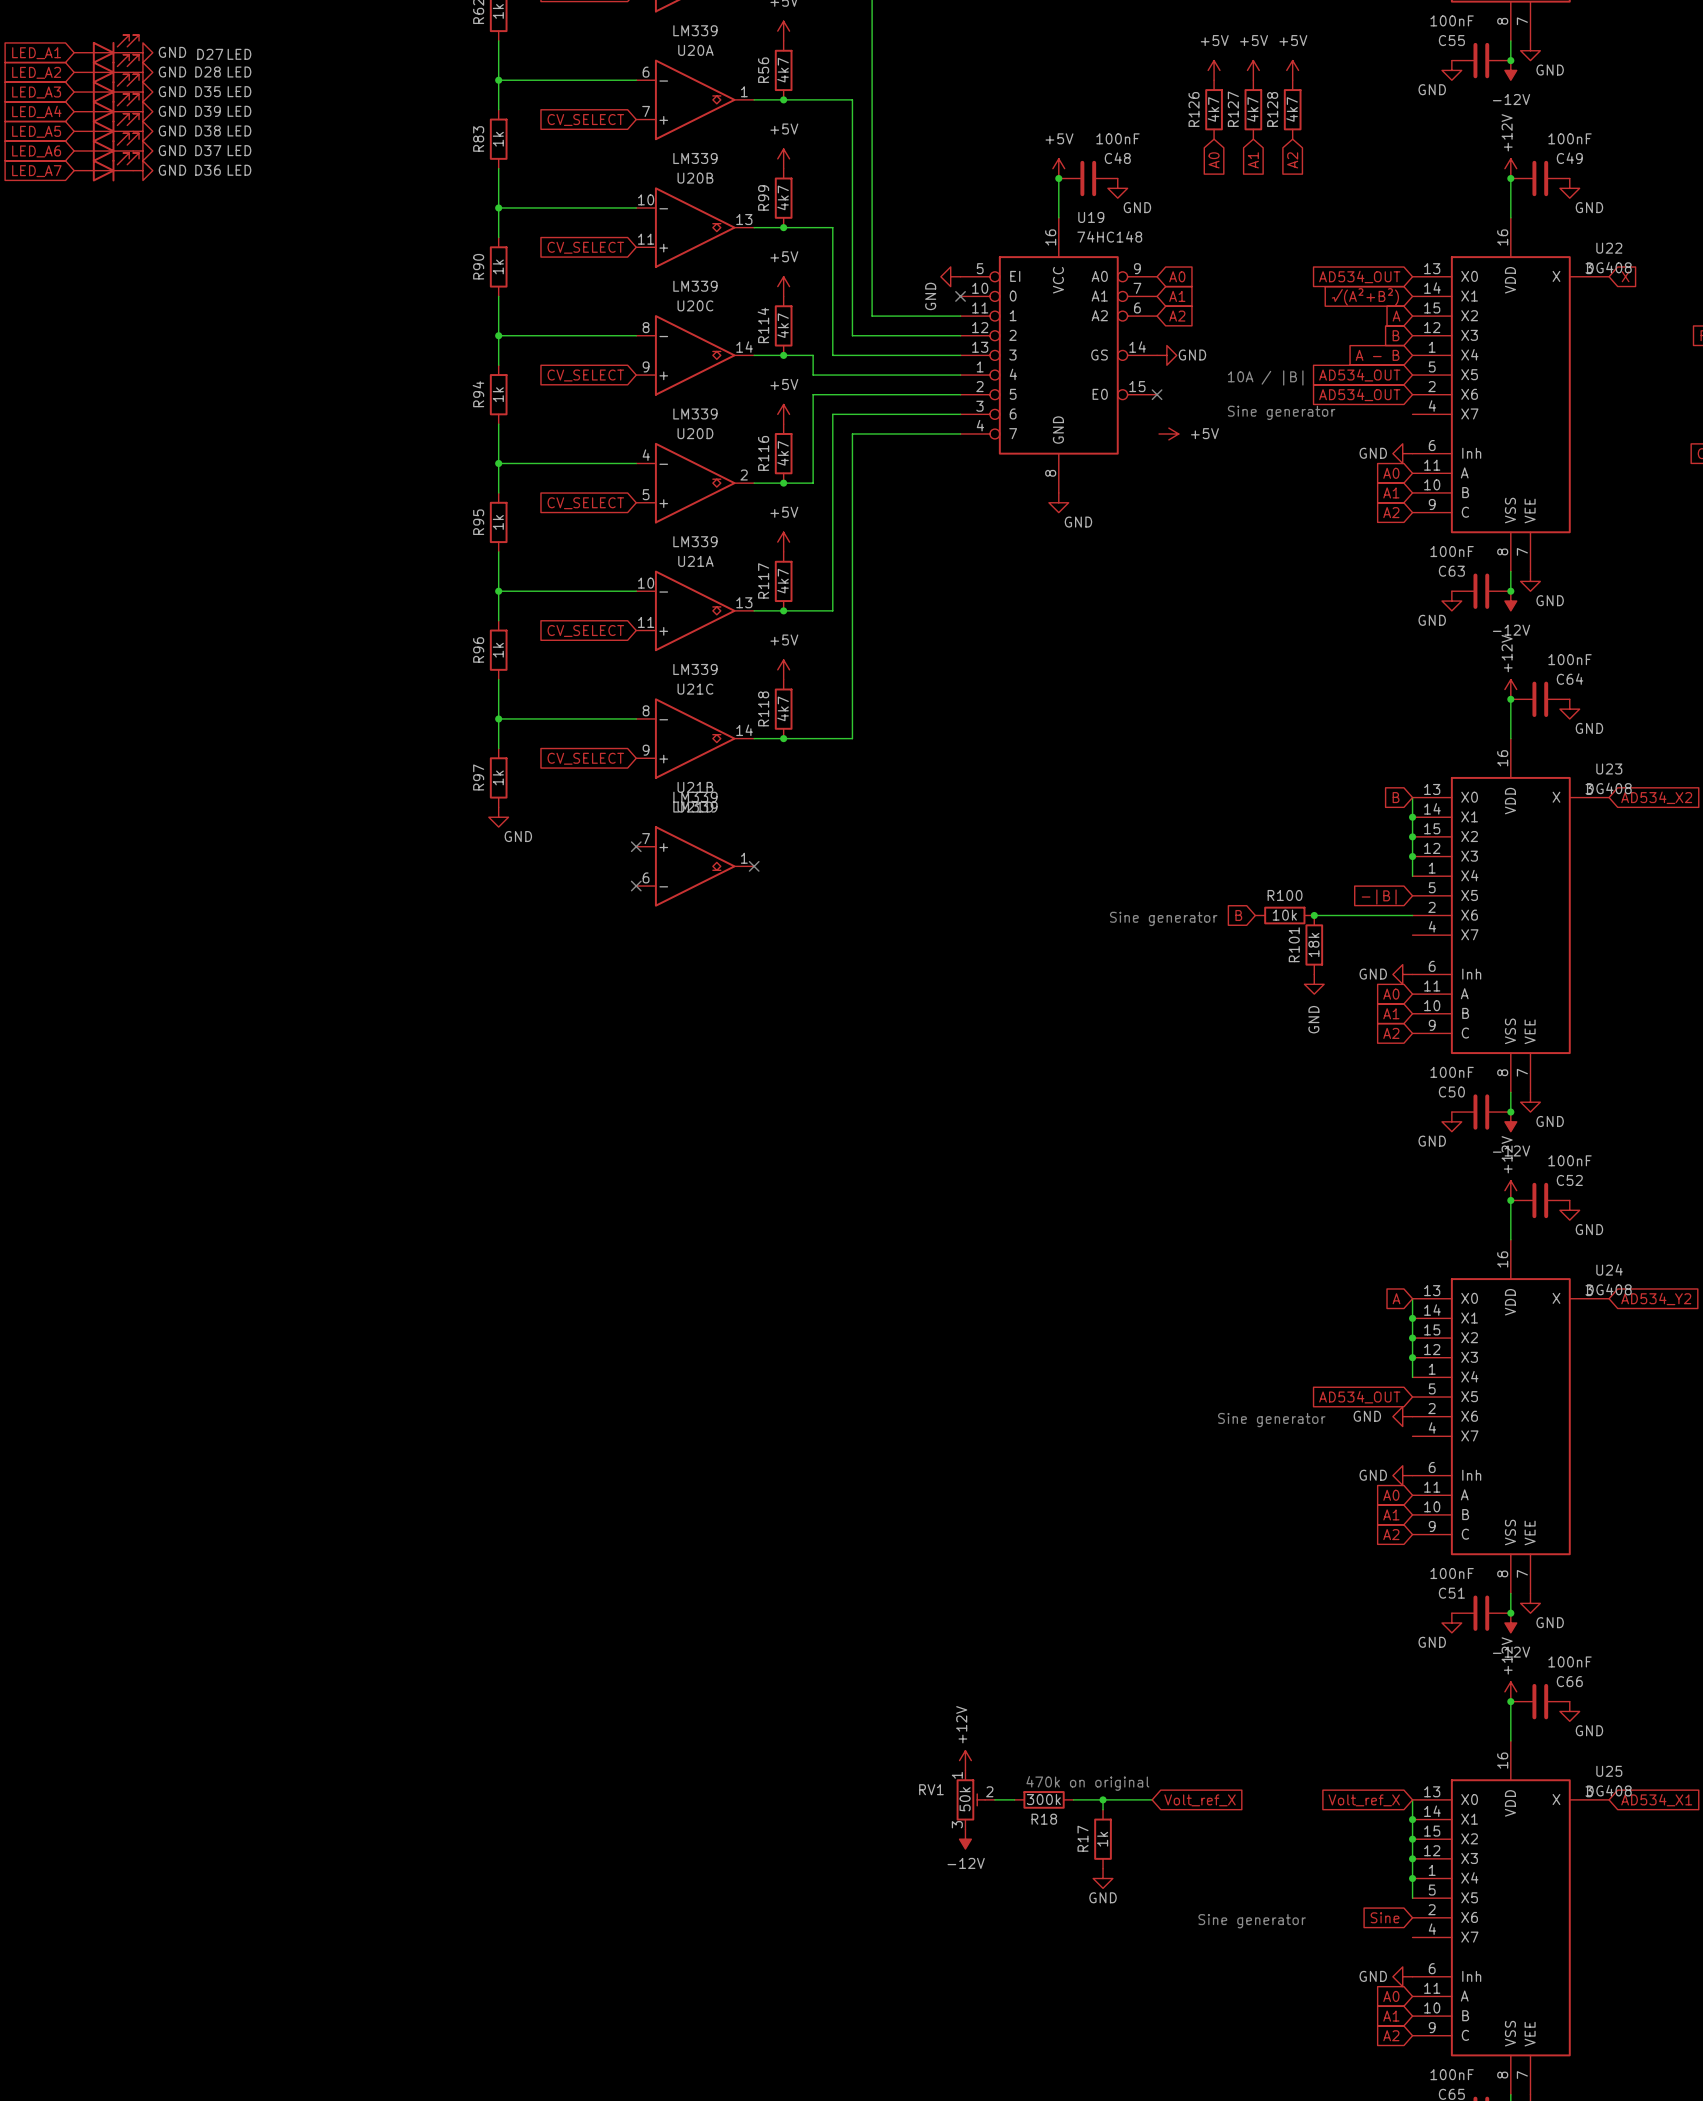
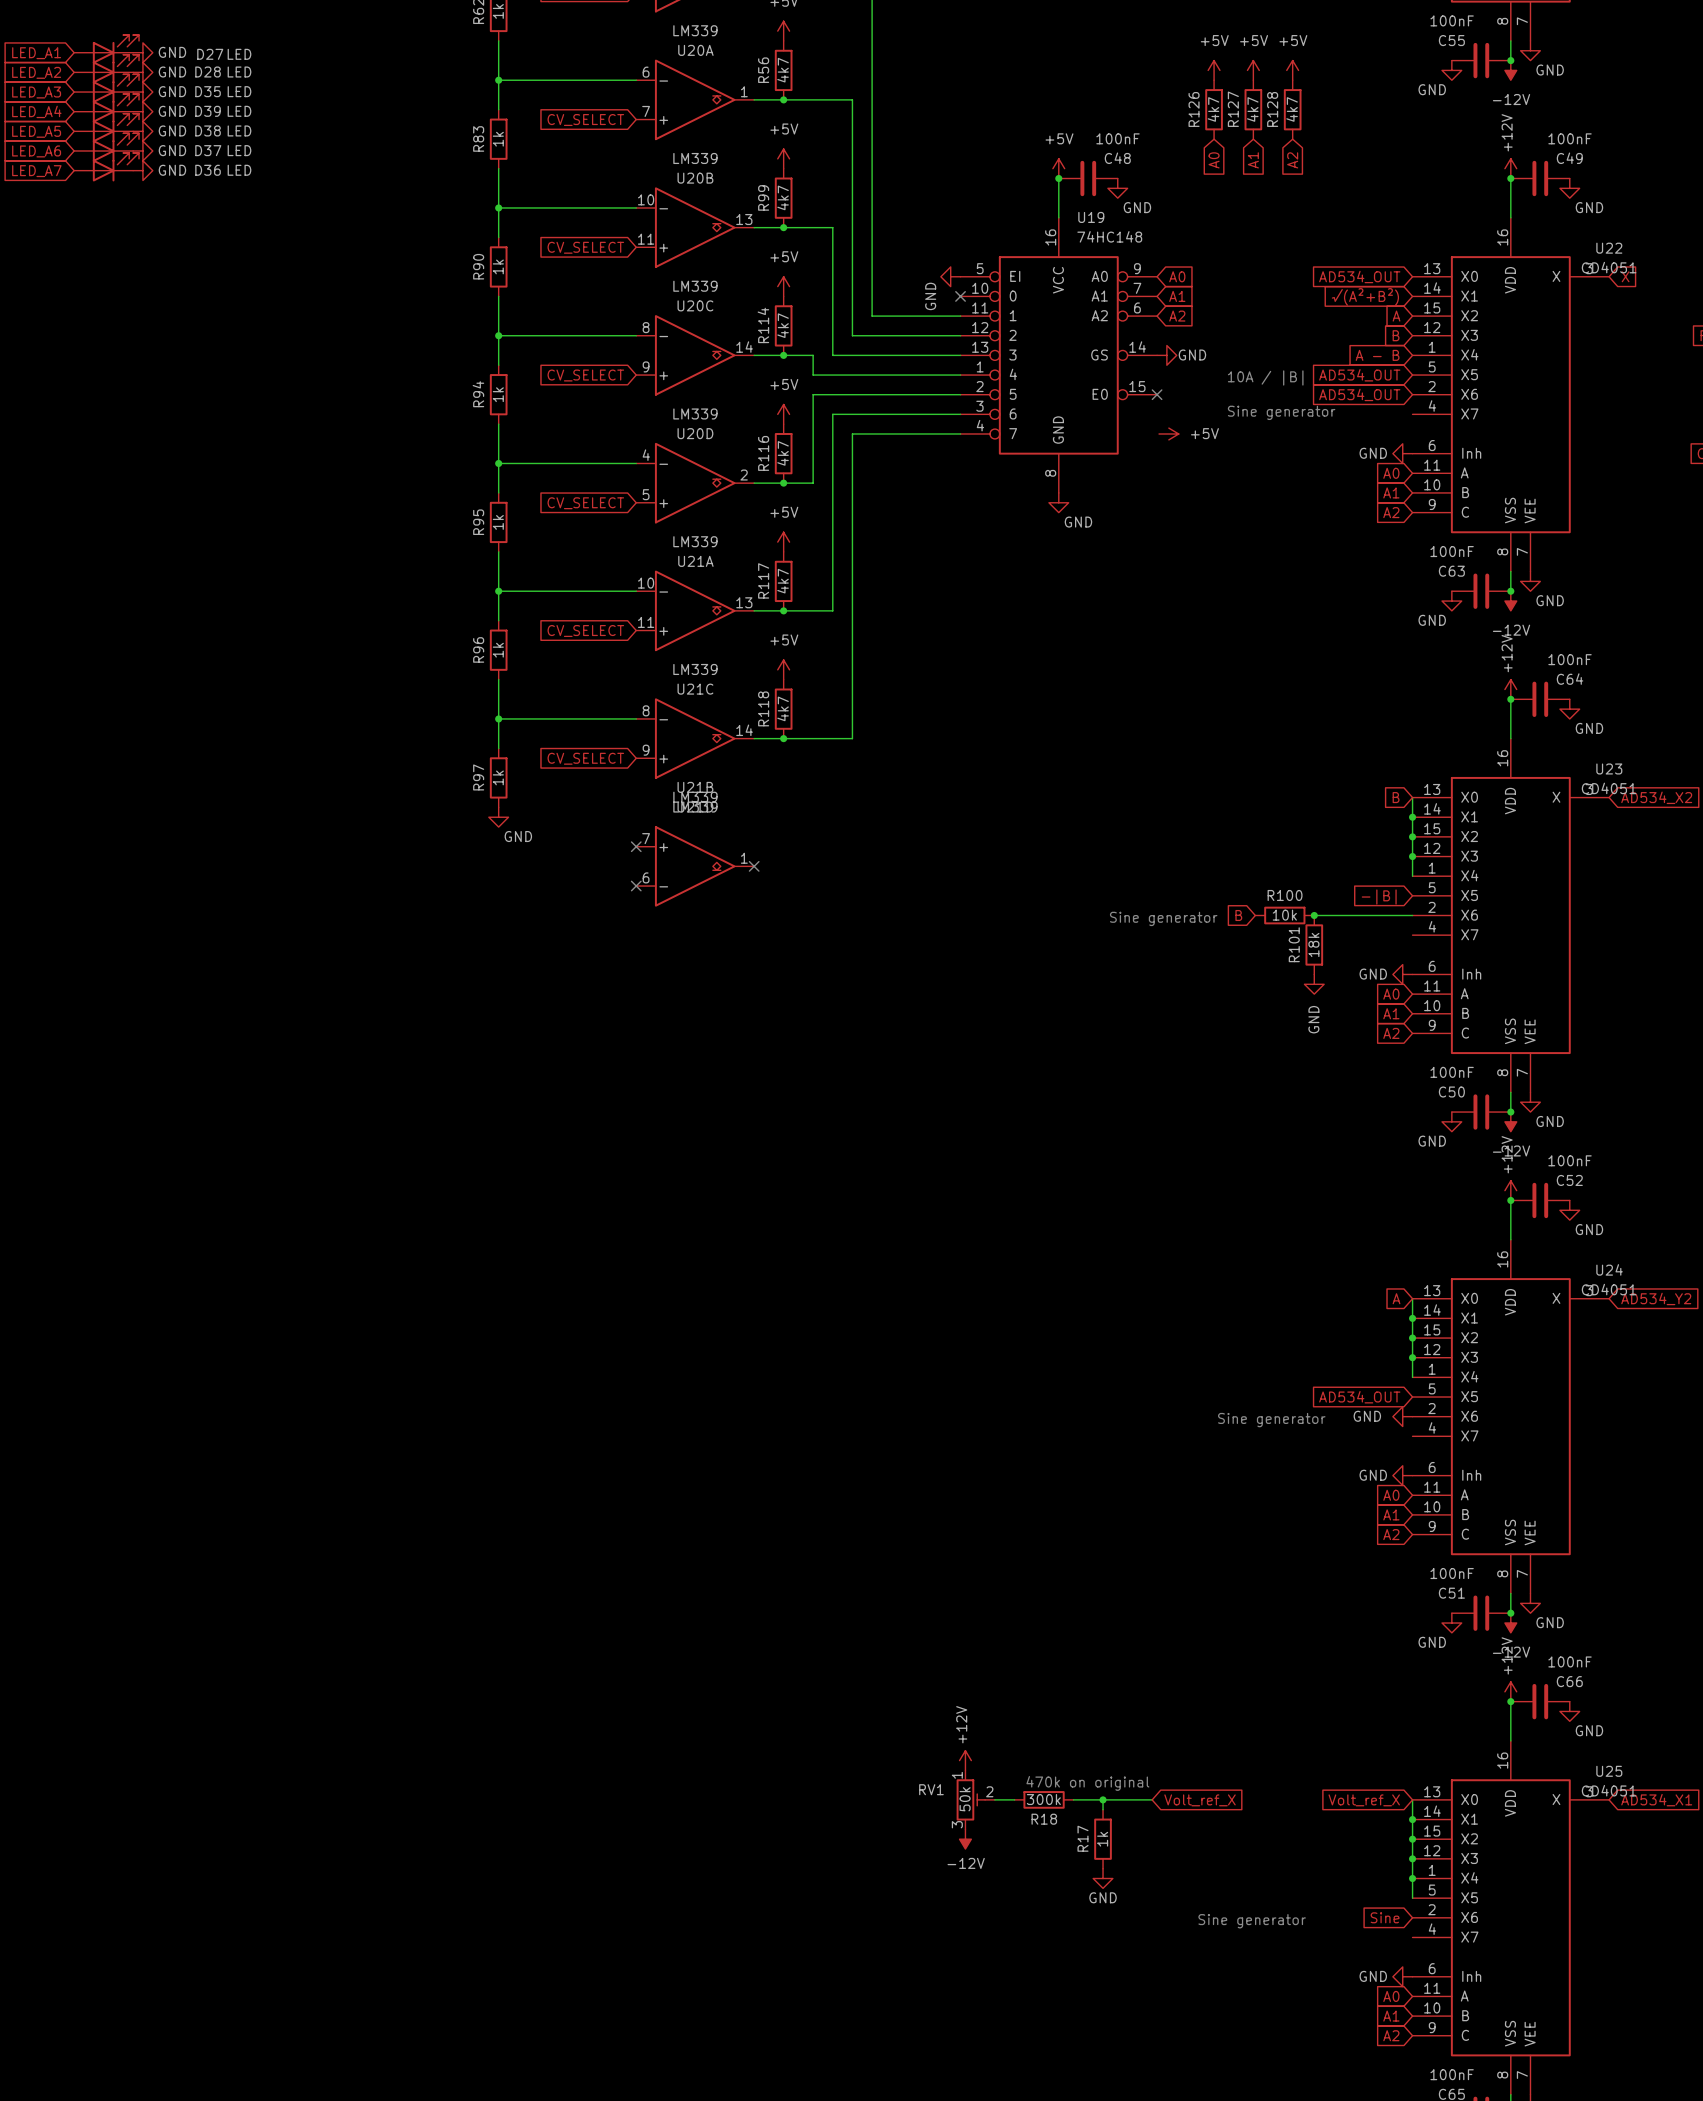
U22 value: DG408 (1609, 267) -> CD4051 (1609, 267)
U23 value: DG408 (1609, 788) -> CD4051 (1609, 788)
U24 value: DG408 (1609, 1289) -> CD4051 (1609, 1289)
U25 value: DG408 (1609, 1790) -> CD4051 (1609, 1790)

